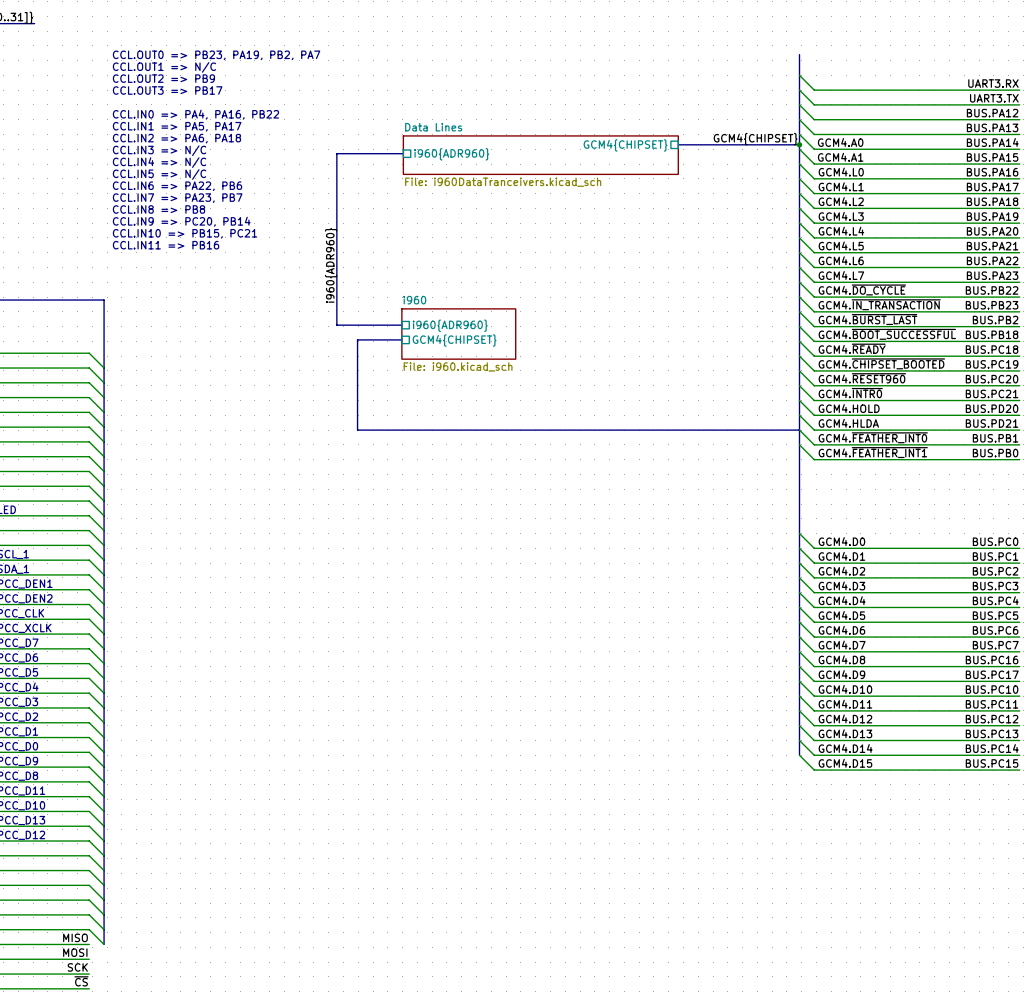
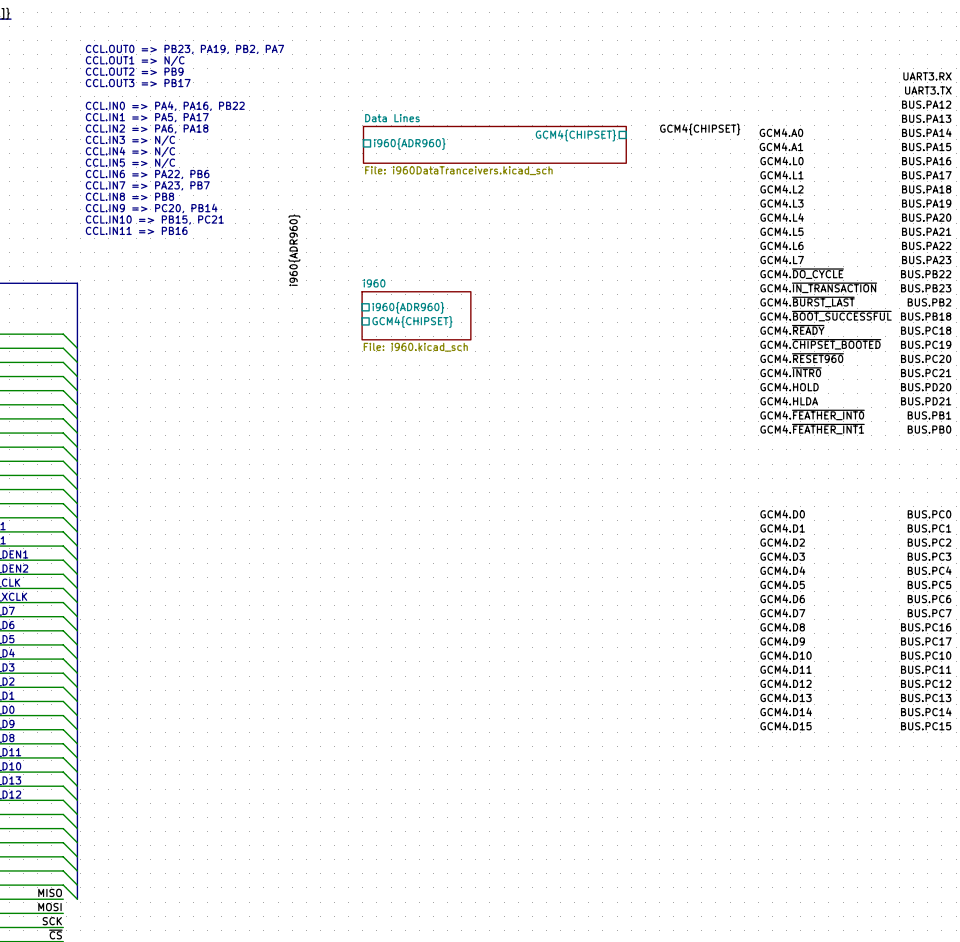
bus: (799, 54) (799, 755) -> none
wire: (799, 75) (814, 90) (1019, 90) -> none
wire: (799, 90) (814, 104) (1019, 104) -> none
wire: (799, 104) (814, 119) (1019, 119) -> none
wire: (799, 119) (814, 134) (1019, 134) -> none
wire: (799, 134) (814, 149) (1019, 149) -> none
bus: (678, 144) (799, 144) -> none
junction: (799, 144) -> none
wire: (799, 149) (814, 164) (1019, 164) -> none
bus: (403, 153) (336, 153) (336, 325) (401, 325) -> none
wire: (799, 164) (814, 178) (1019, 178) -> none
wire: (799, 178) (814, 193) (1019, 193) -> none
wire: (799, 193) (814, 208) (1019, 208) -> none
wire: (799, 208) (814, 223) (1019, 223) -> none
wire: (799, 223) (814, 237) (1019, 237) -> none
wire: (799, 237) (814, 252) (1019, 252) -> none
wire: (799, 252) (814, 267) (1019, 267) -> none
wire: (799, 267) (814, 282) (1019, 282) -> none
wire: (799, 282) (814, 297) (1019, 297) -> none
wire: (799, 297) (814, 311) (1019, 311) -> none
wire: (799, 311) (814, 326) (1019, 326) -> none
wire: (799, 326) (814, 341) (1019, 341) -> none
bus: (401, 339) (357, 339) (357, 430) (799, 430) -> none
wire: (799, 341) (814, 356) (1019, 356) -> none
wire: (799, 356) (814, 370) (1019, 370) -> none
wire: (799, 370) (814, 385) (1019, 385) -> none
wire: (799, 385) (814, 400) (1019, 400) -> none
wire: (799, 400) (814, 415) (1019, 415) -> none
wire: (799, 415) (814, 430) (1019, 430) -> none
wire: (799, 430) (814, 444) (1019, 444) -> none
wire: (799, 444) (814, 459) (1019, 459) -> none
wire: (799, 533) (814, 548) (1019, 548) -> none
wire: (799, 548) (814, 563) (1019, 563) -> none
wire: (799, 563) (814, 577) (1019, 577) -> none
wire: (799, 577) (814, 592) (1019, 592) -> none
wire: (799, 592) (814, 607) (1019, 607) -> none
wire: (799, 607) (814, 622) (1019, 622) -> none
wire: (799, 622) (814, 637) (1019, 637) -> none
wire: (799, 637) (814, 651) (1019, 651) -> none
wire: (799, 651) (814, 666) (1019, 666) -> none
wire: (799, 666) (814, 681) (1019, 681) -> none
wire: (799, 681) (814, 696) (1019, 696) -> none
wire: (799, 696) (814, 710) (1019, 710) -> none
wire: (799, 710) (814, 725) (1019, 725) -> none
wire: (799, 725) (814, 740) (1019, 740) -> none
wire: (799, 740) (814, 755) (1019, 755) -> none
wire: (799, 755) (814, 770) (1019, 770) -> none

